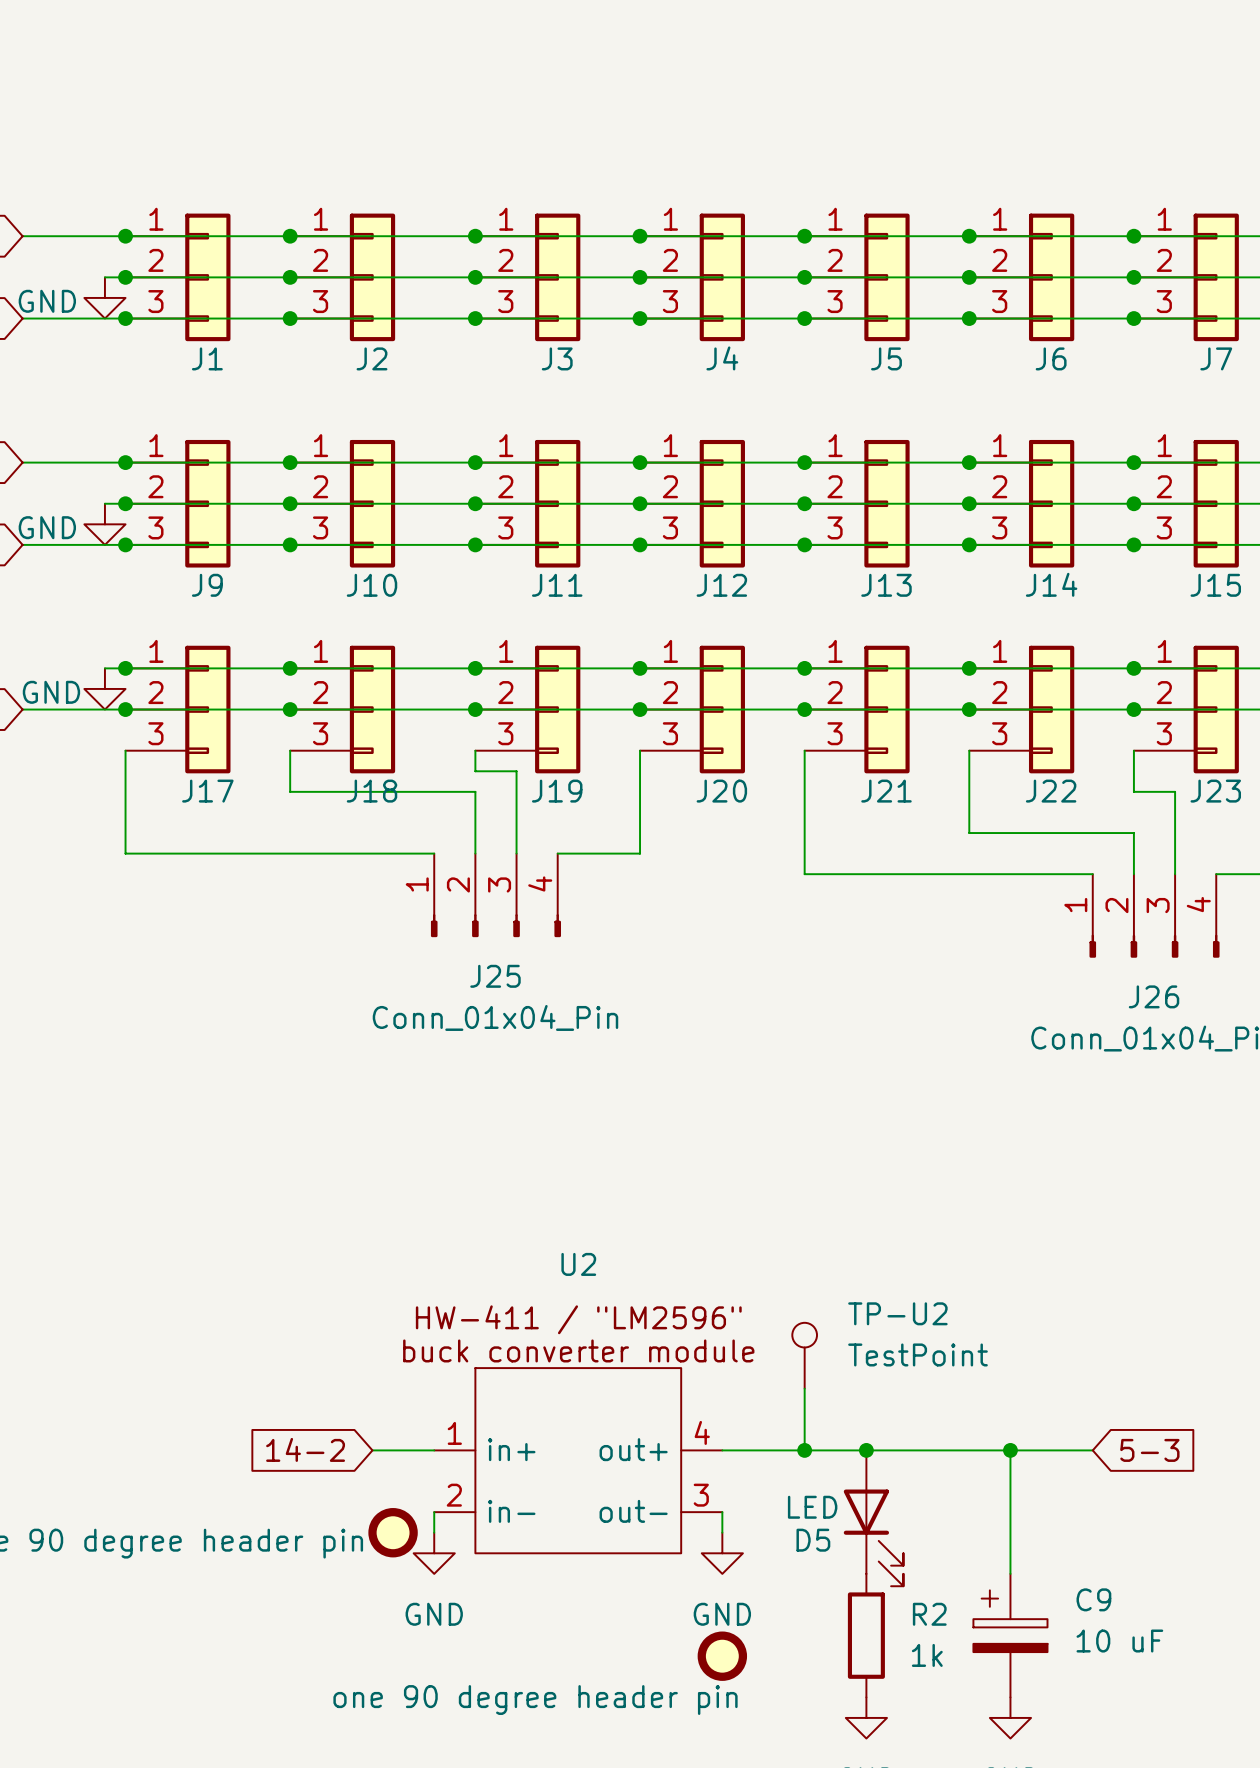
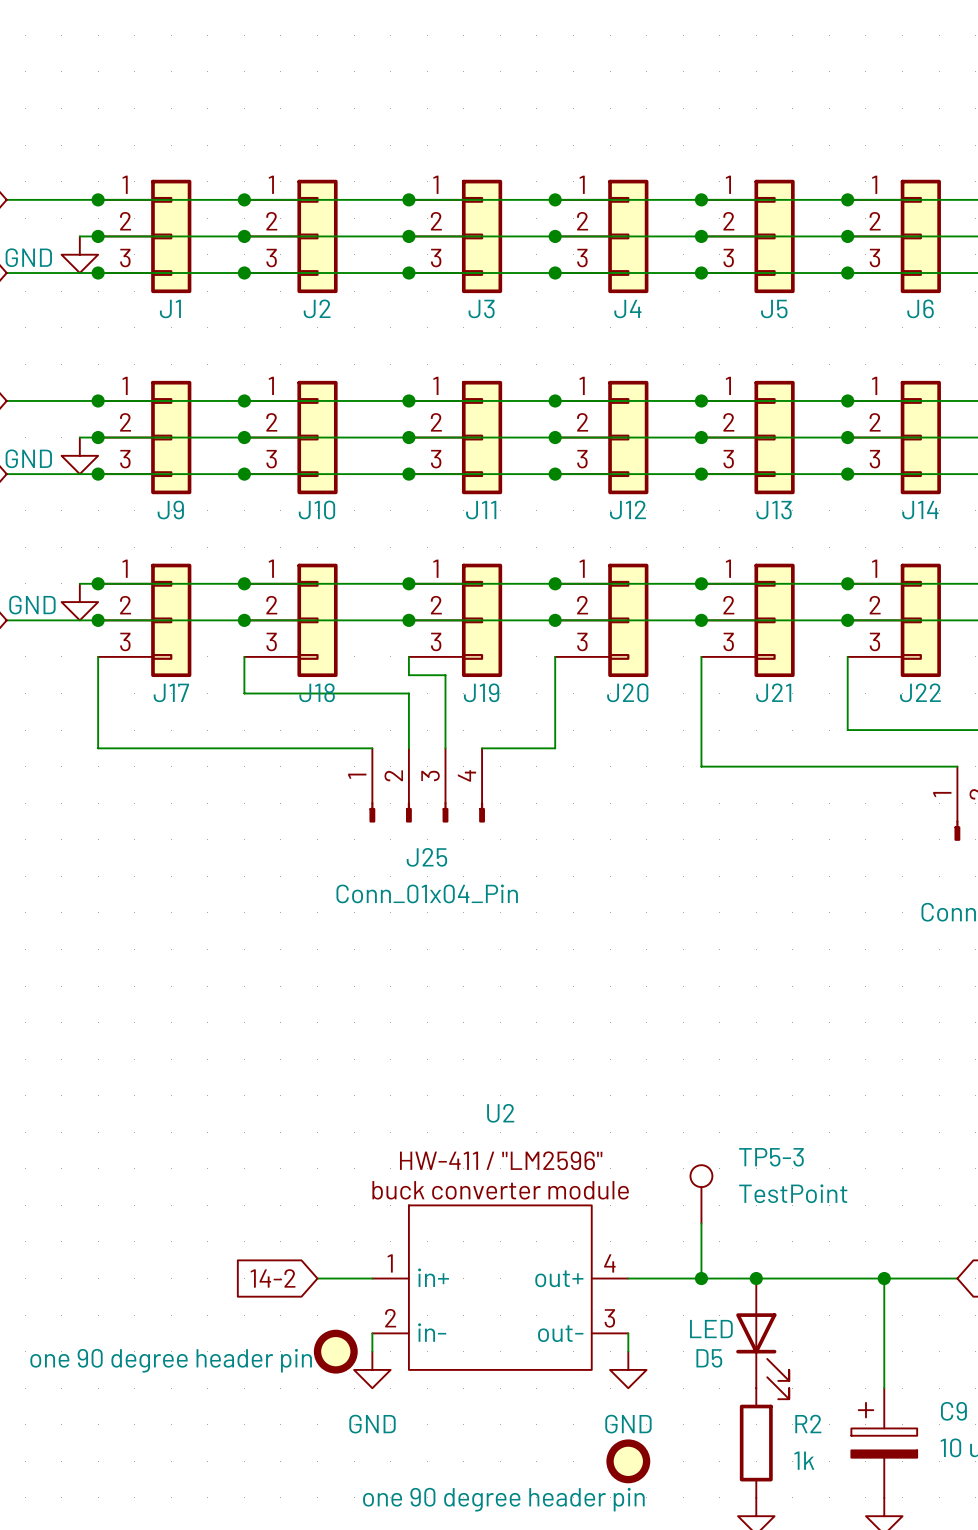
TP-U2 name: TP-U2 (897, 1313) -> TP5-3 (771, 1157)

